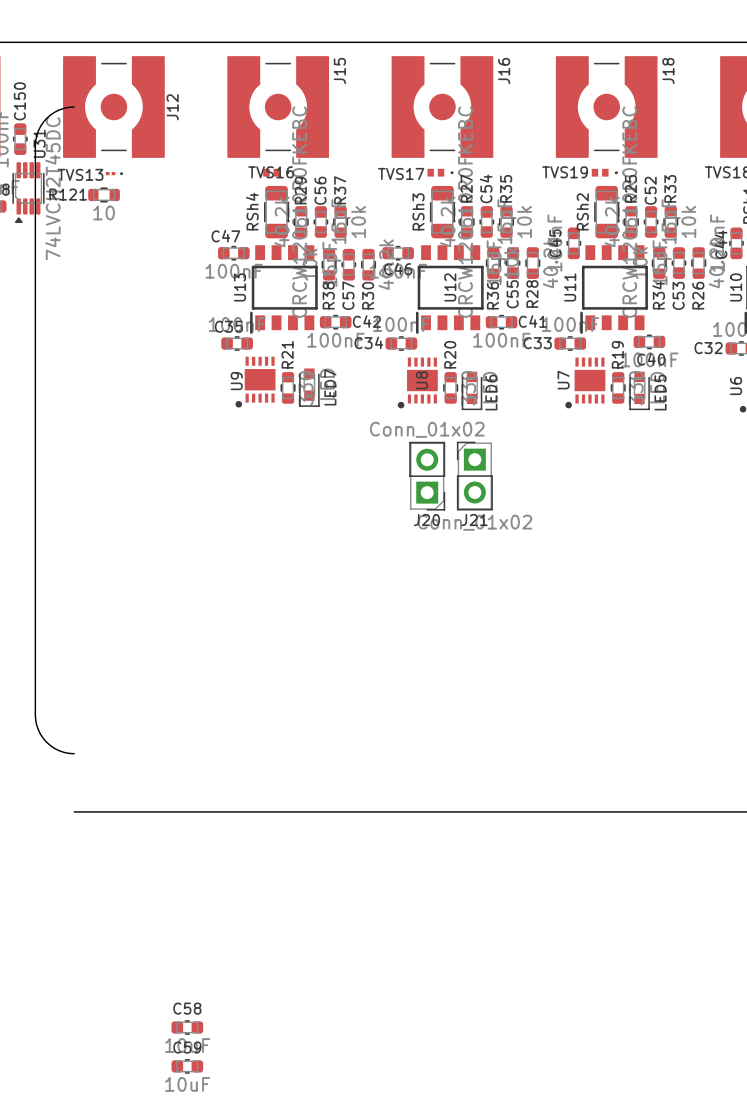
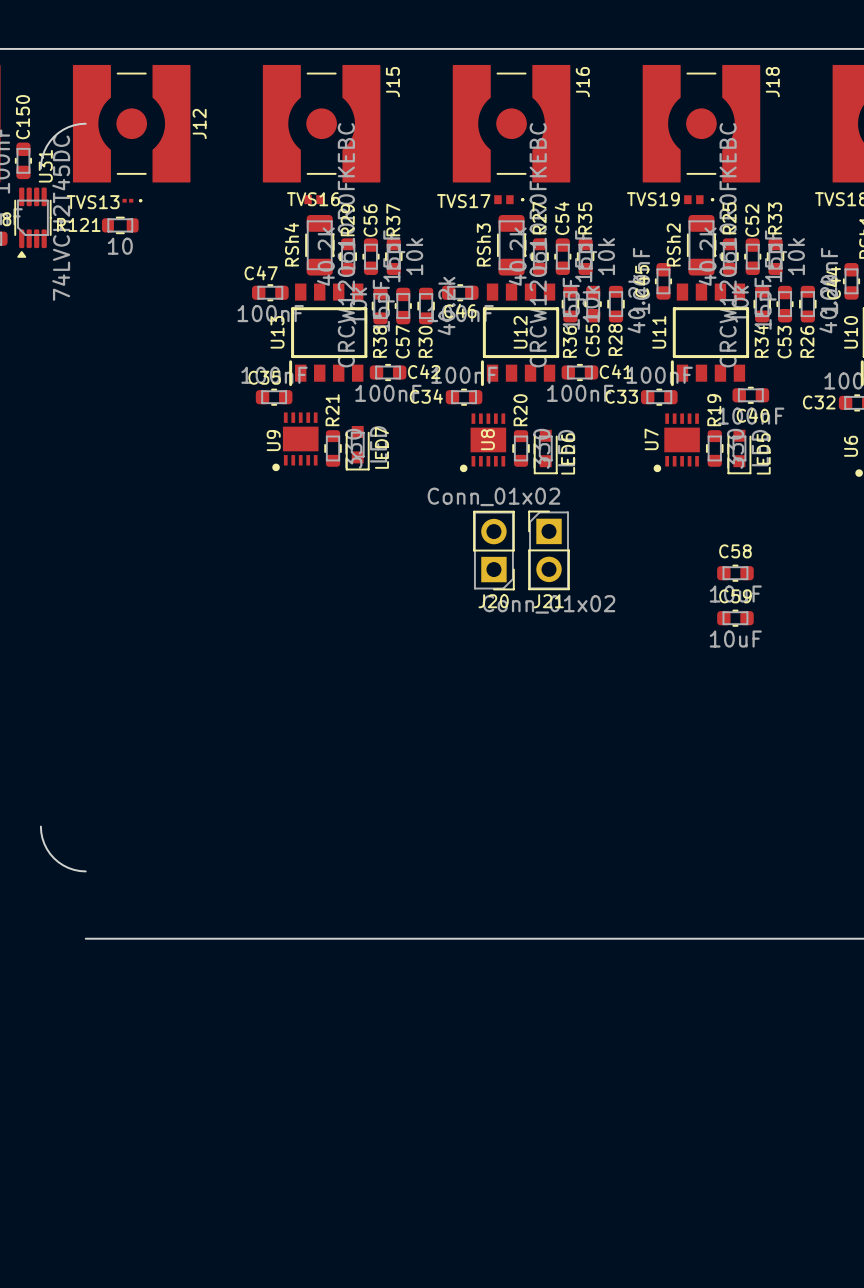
board edge: (35, 145) (35, 714) -> none
C58 position: (187, 1027) -> (735, 573)
C59 position: (187, 1066) -> (735, 618)

